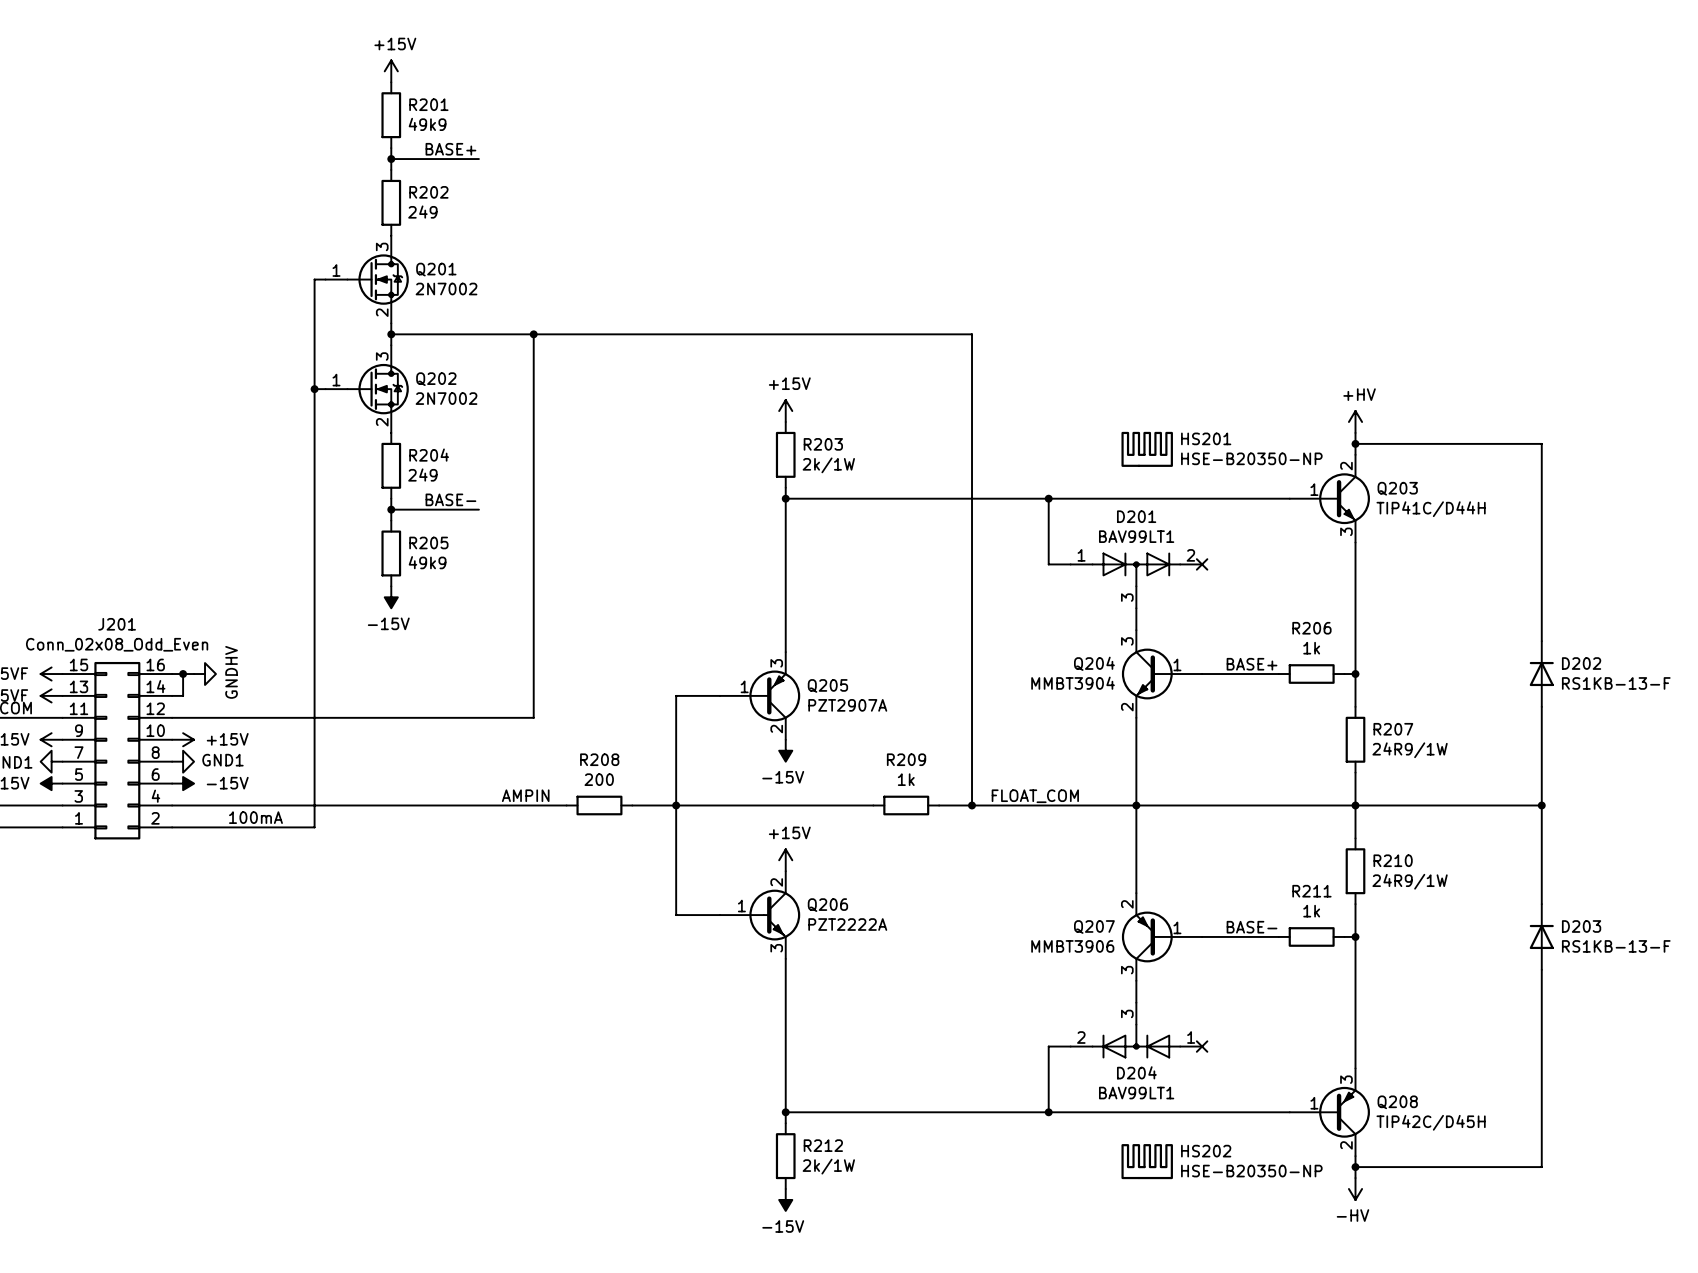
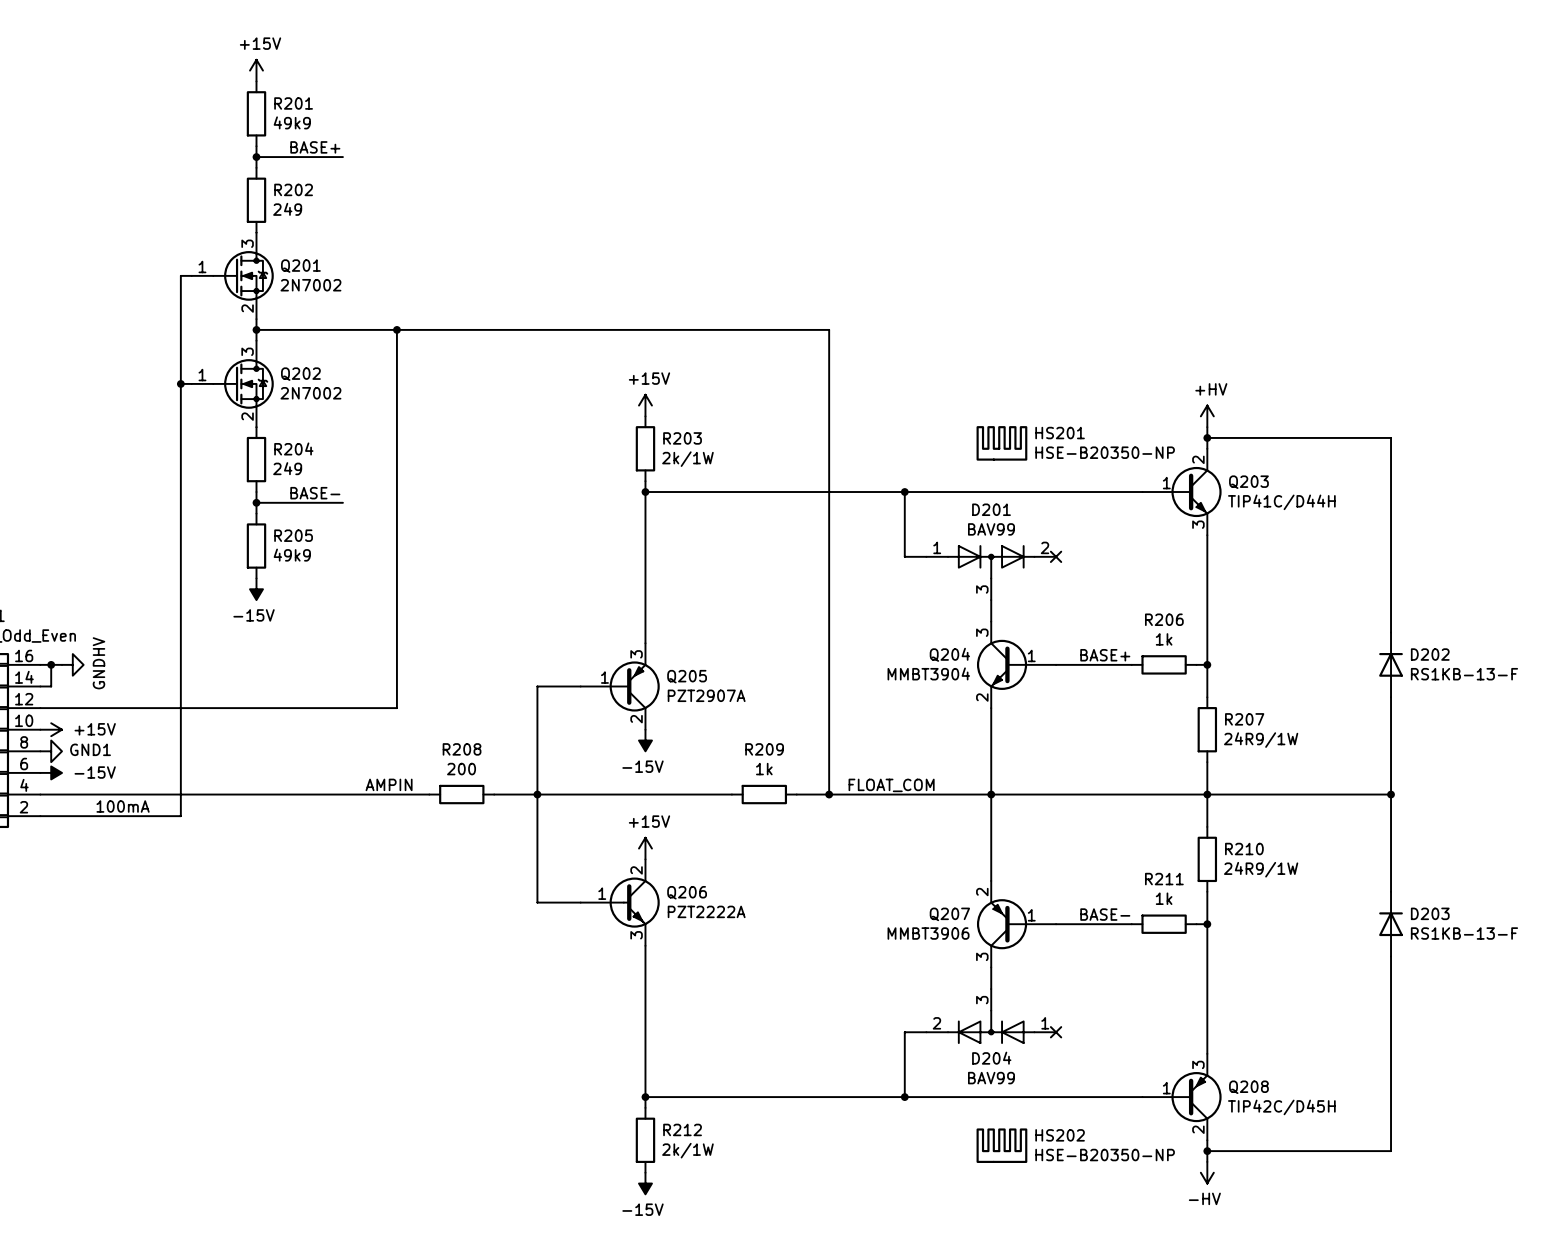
D201 value: BAV99LT1 (1136, 536) -> BAV99 (991, 529)
D204 value: BAV99LT1 (1136, 1093) -> BAV99 (991, 1078)

